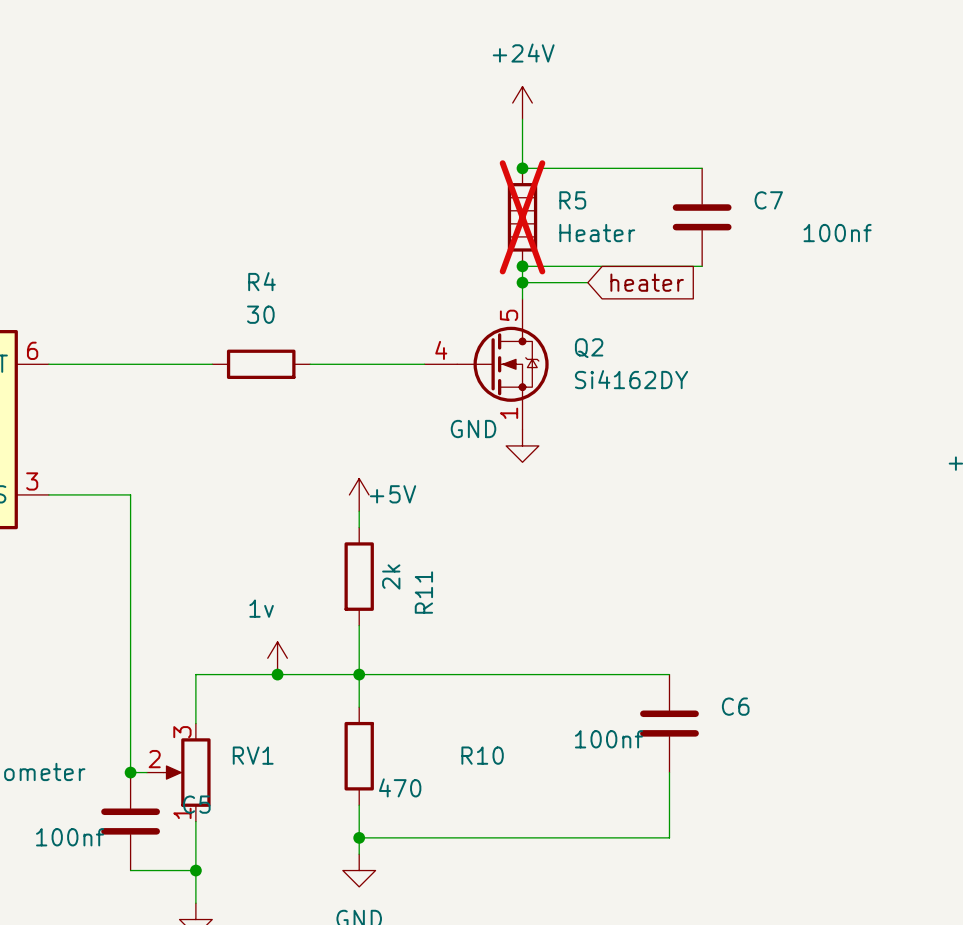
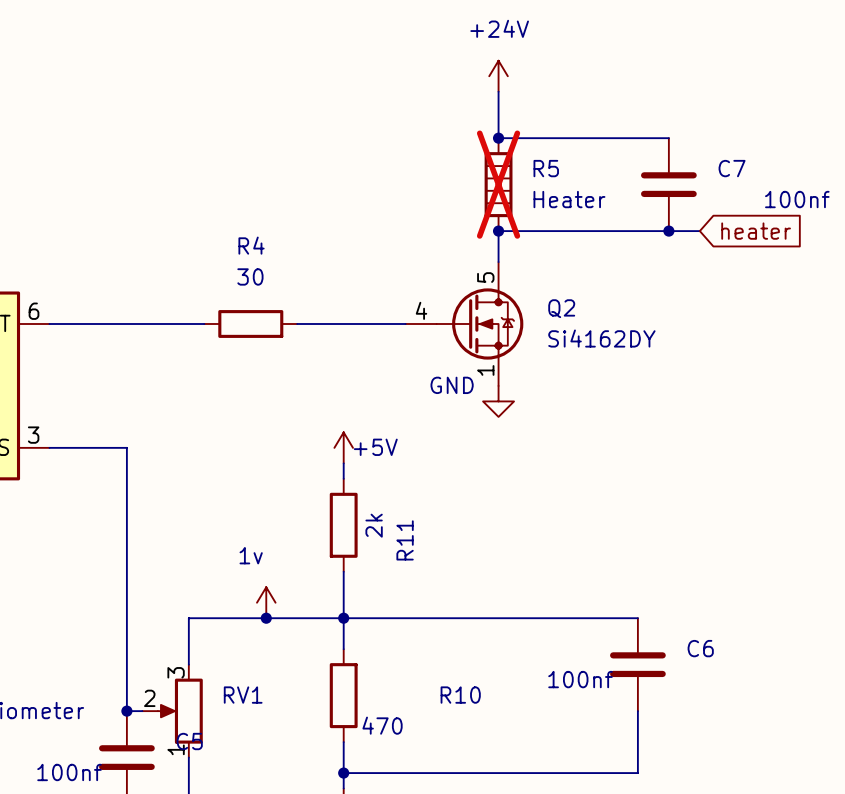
wire: none -> (668, 231) (699, 231)
junction: none -> (668, 231)
wire: (522, 282) (587, 282) -> none
junction: (522, 282) -> none
global label position: heater (647, 282) -> heater (756, 231)

